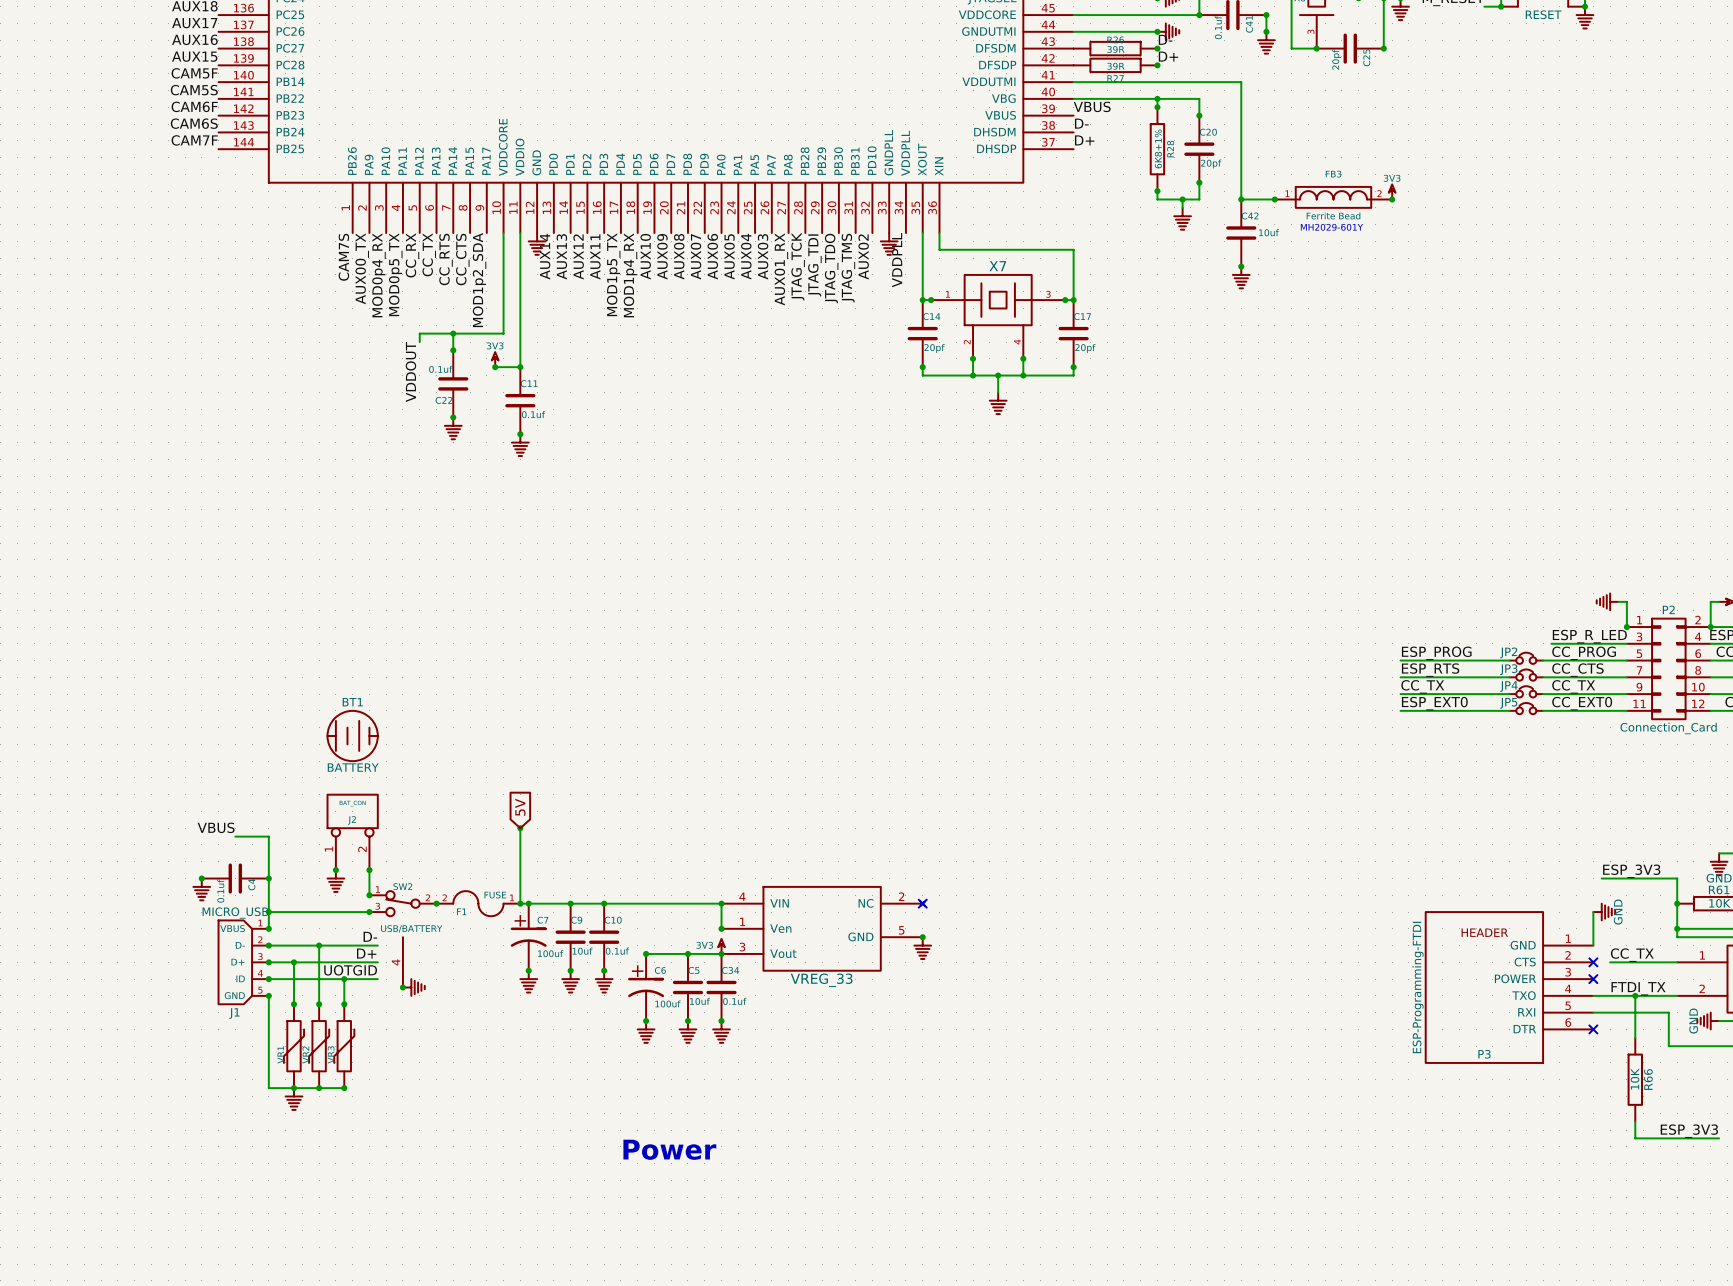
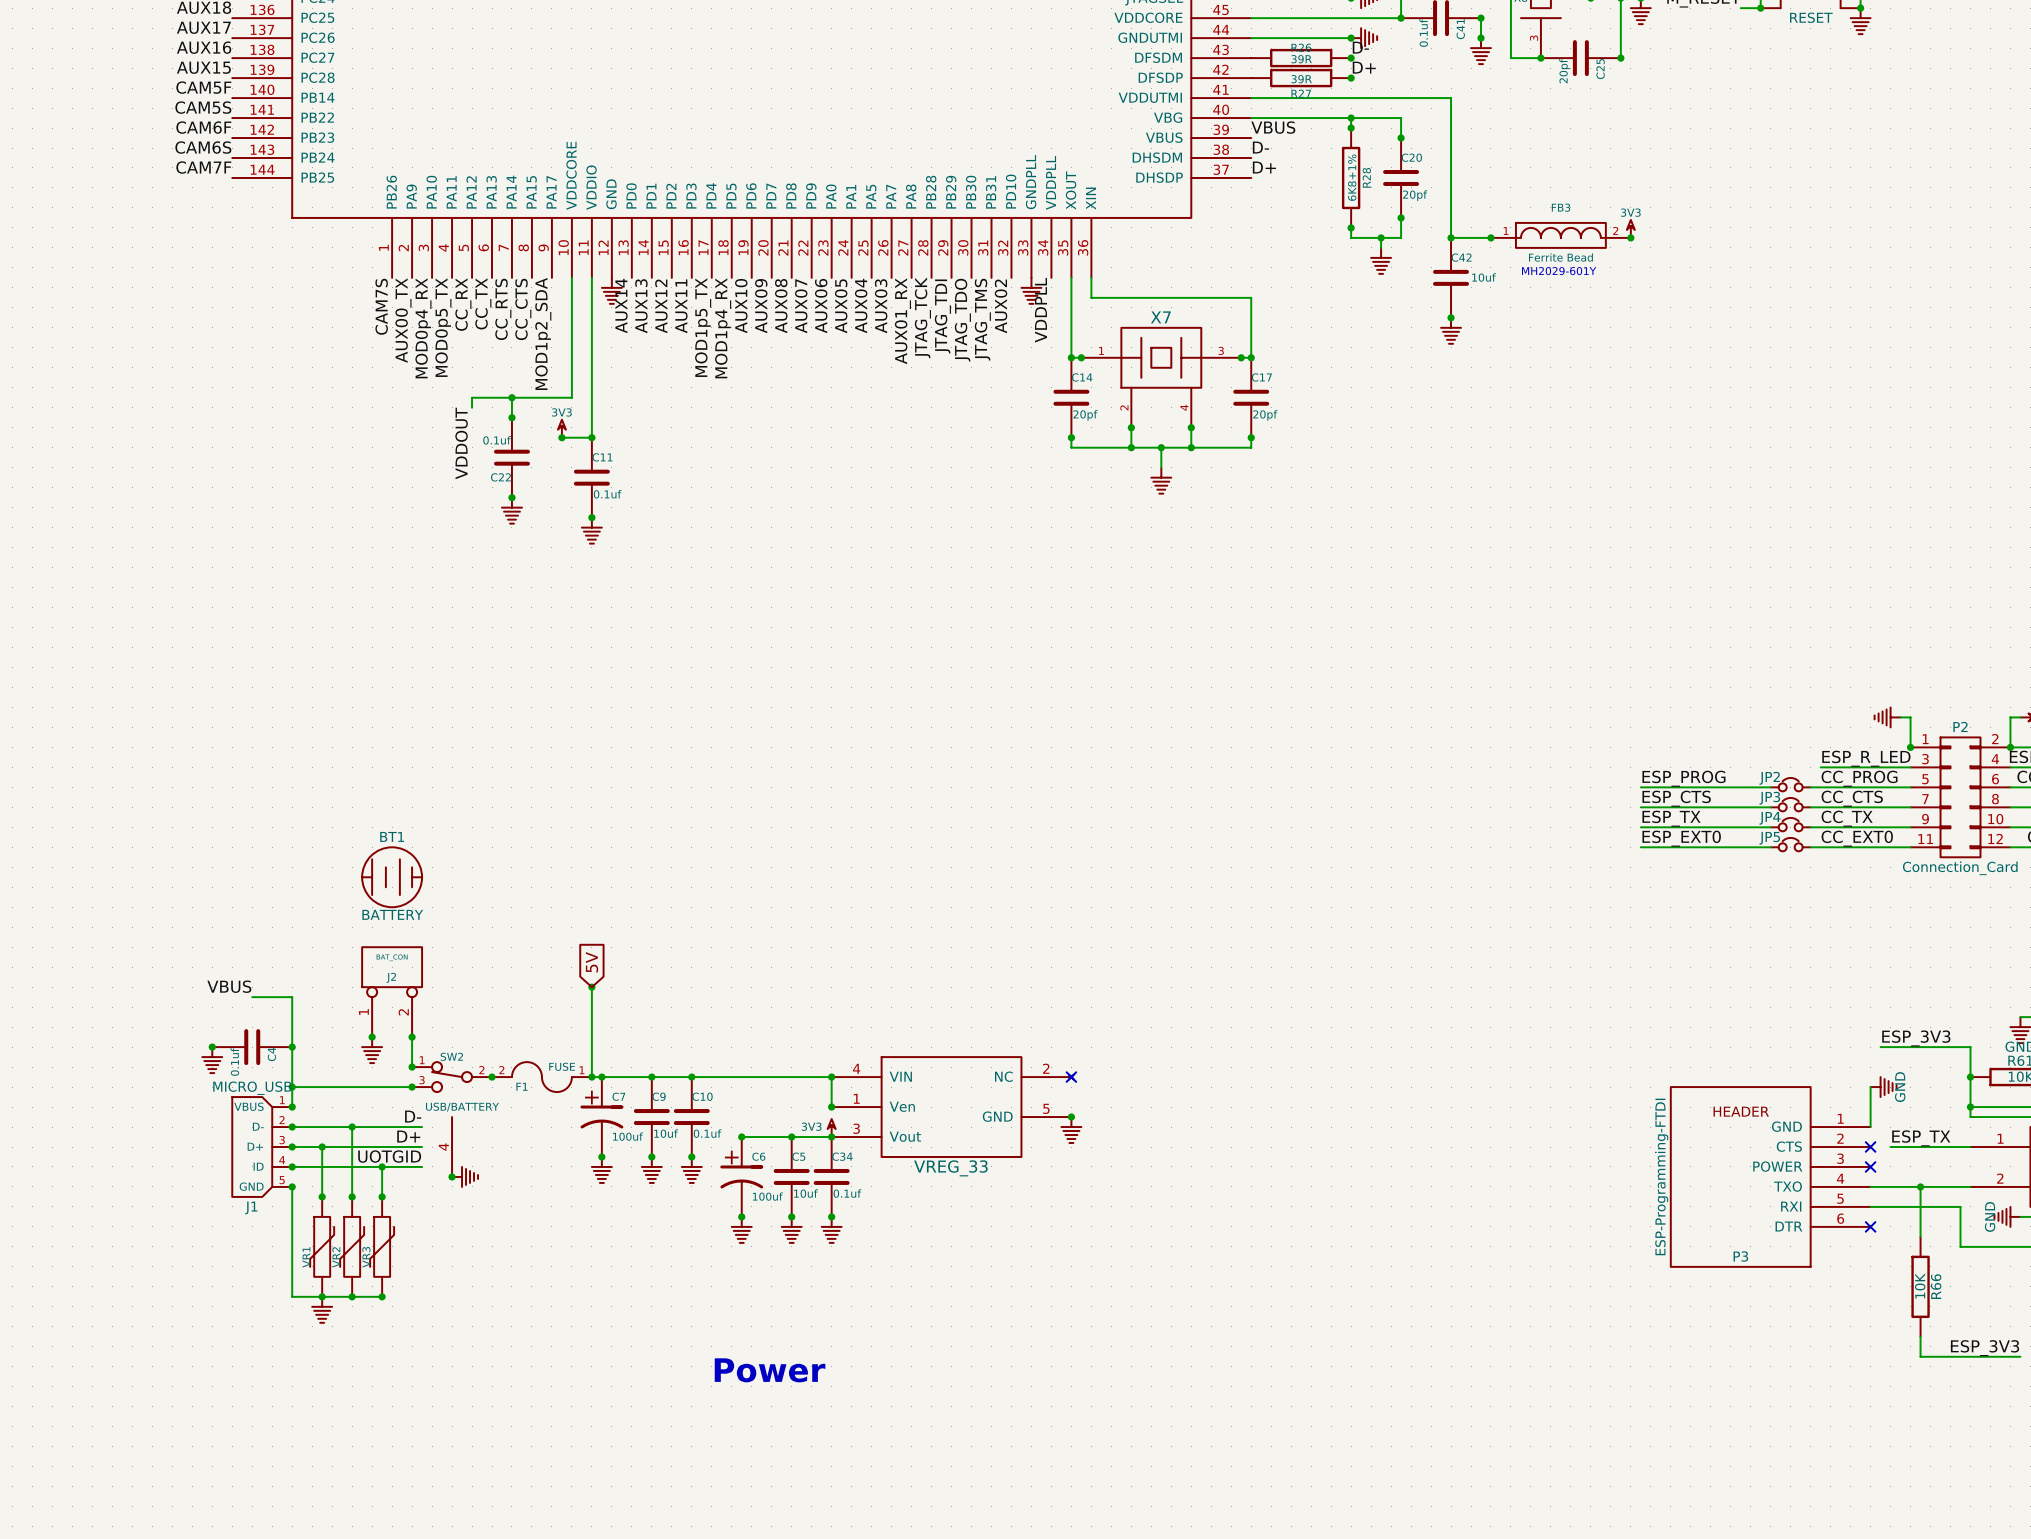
label: ESP_RTS (1430, 670) -> ESP_CTS (1676, 798)
label: CC_TX (1422, 686) -> ESP_TX (1671, 818)
label: CC_TX (1632, 955) -> ESP_TX (1921, 1138)
label: FTDI_TX (1638, 988) -> none

